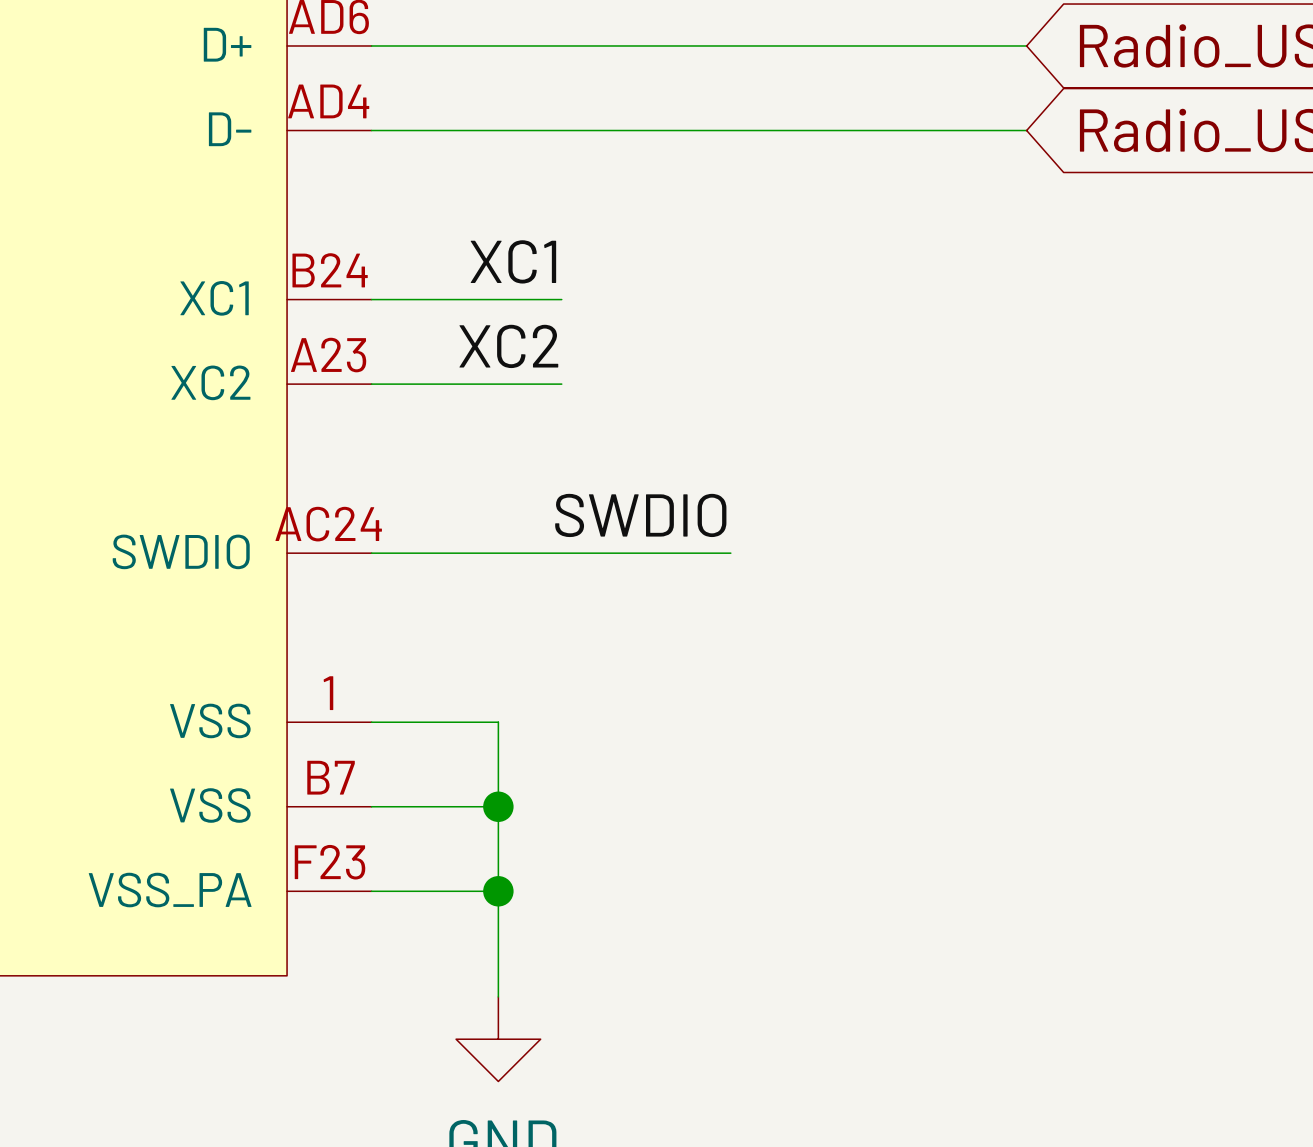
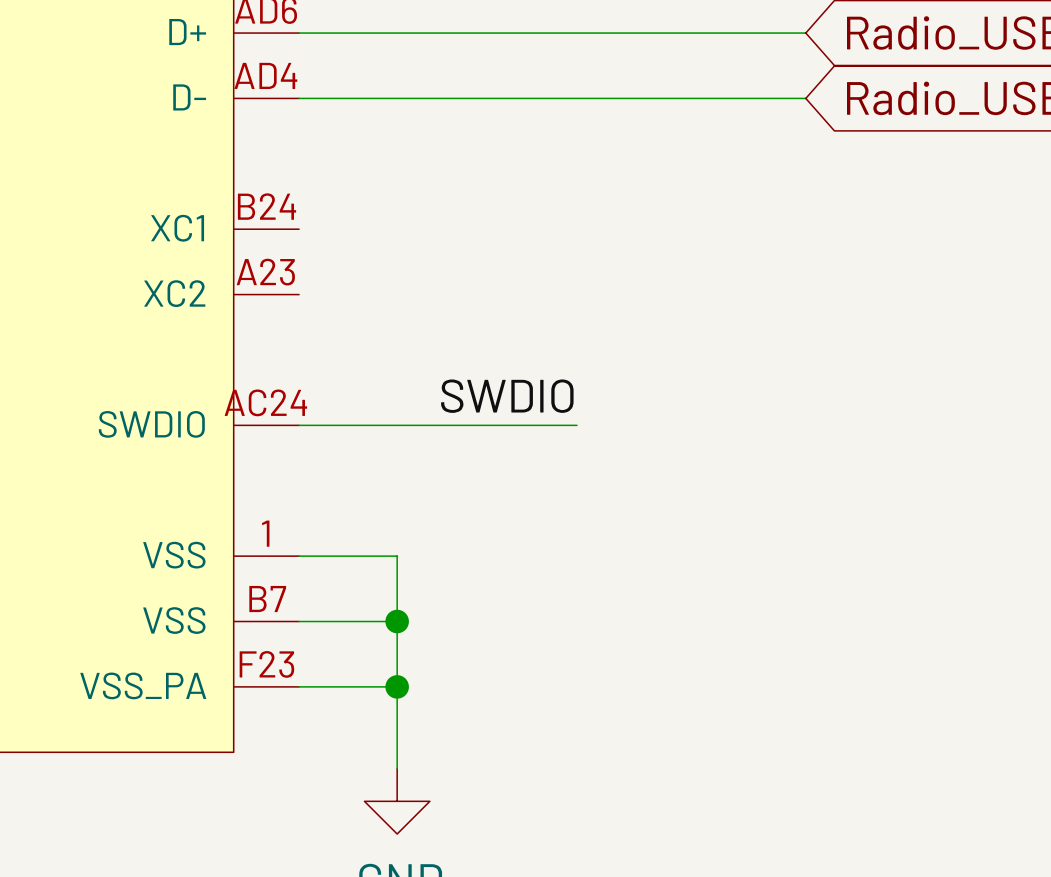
label: XC1 (513, 261) -> none
wire: (371, 299) (561, 299) -> none
label: XC2 (508, 346) -> none
wire: (371, 384) (561, 384) -> none

